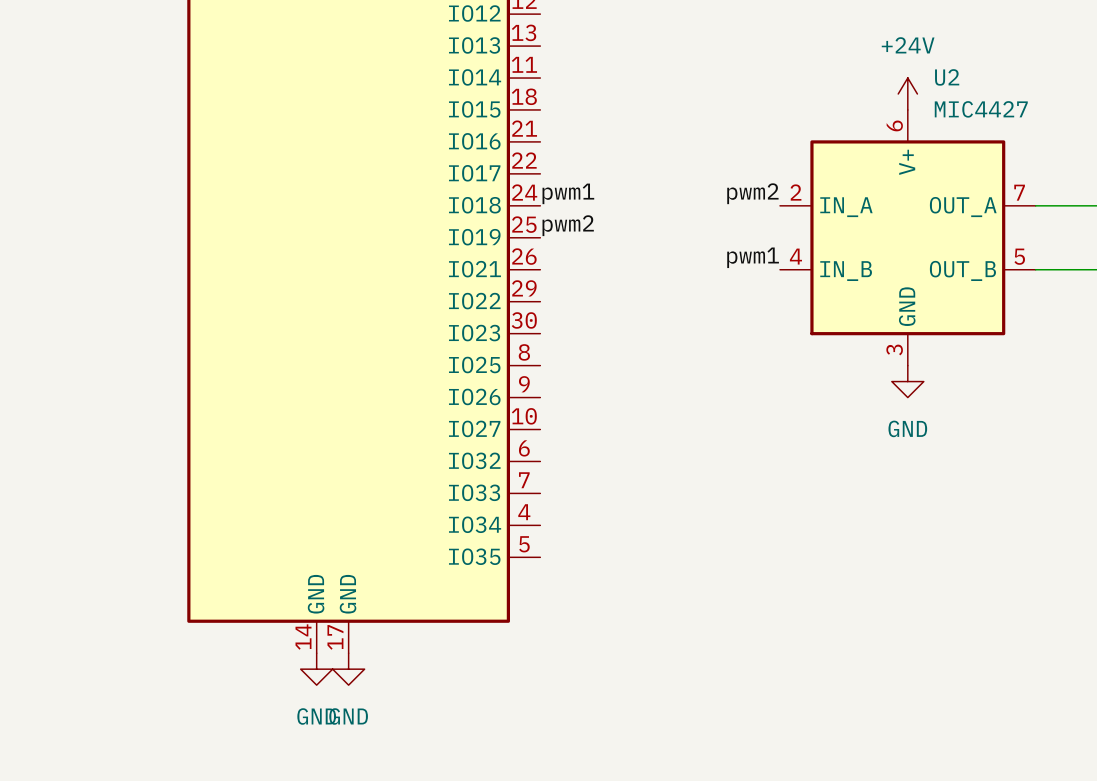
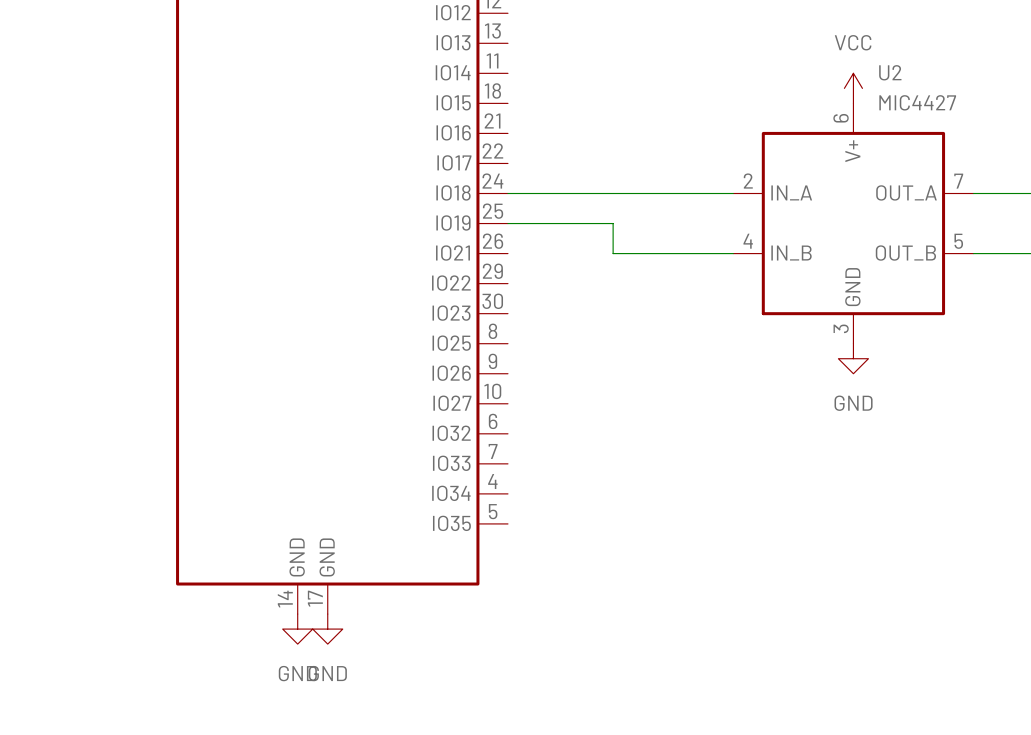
power symbol: +24V (907, 93) -> VCC (853, 88)
label: pwm1 (568, 193) -> none
label: pwm2 (752, 193) -> none
wire: none -> (507, 193) (733, 193)
label: pwm2 (568, 225) -> none
wire: none -> (507, 223) (613, 223) (613, 253) (733, 253)
label: pwm1 (753, 257) -> none

